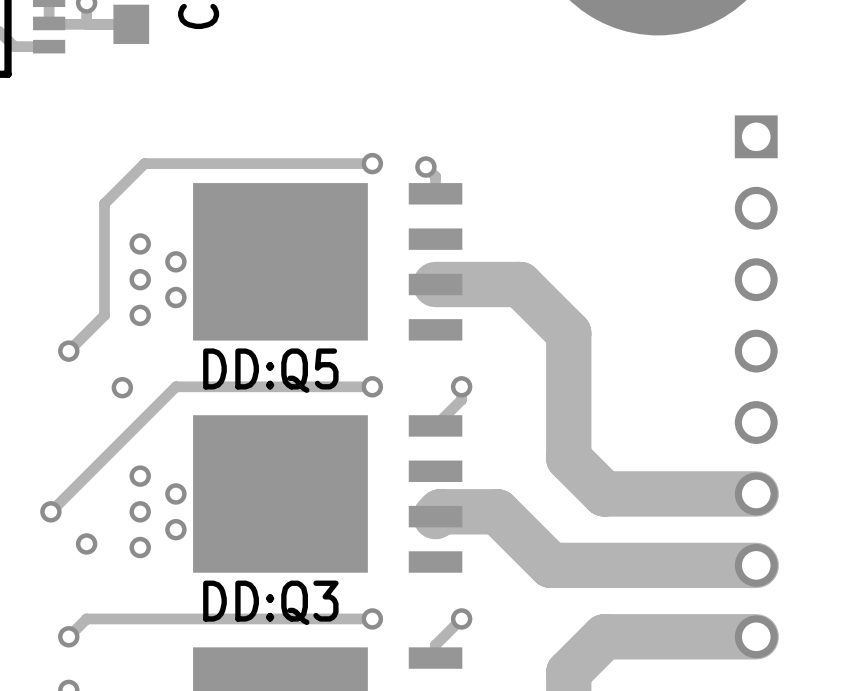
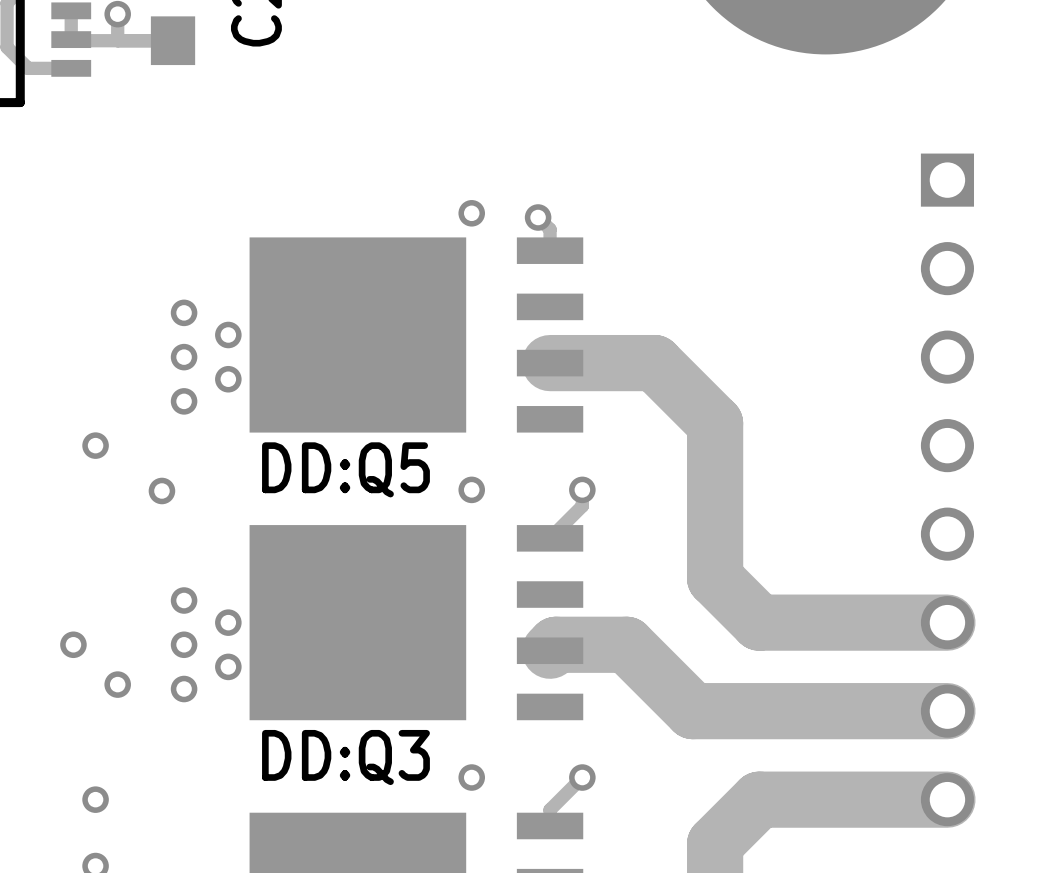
track: (372, 163) (144, 163) (104, 203) (104, 315) (68, 351) -> none
track: (372, 386) (175, 386) (50, 511) -> none
track: (372, 618) (86, 618) (68, 636) -> none

